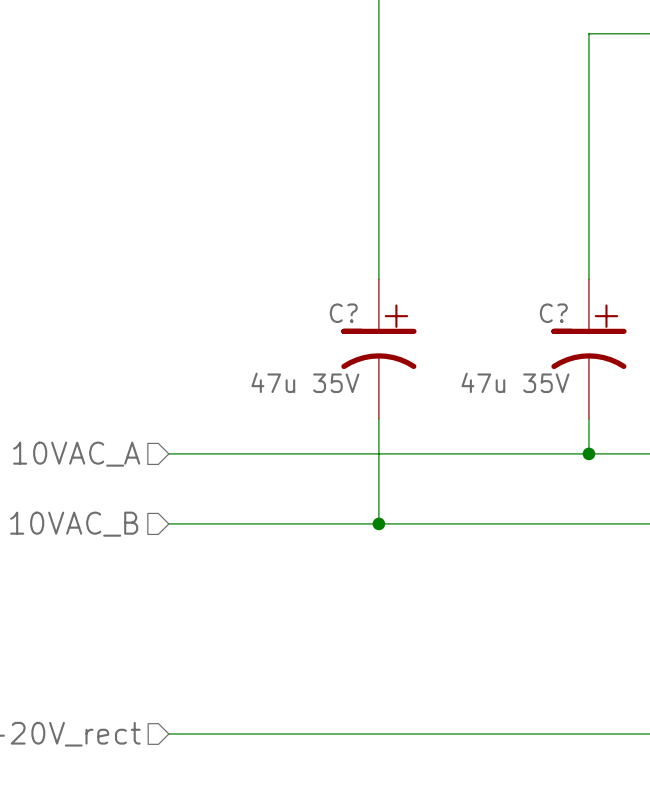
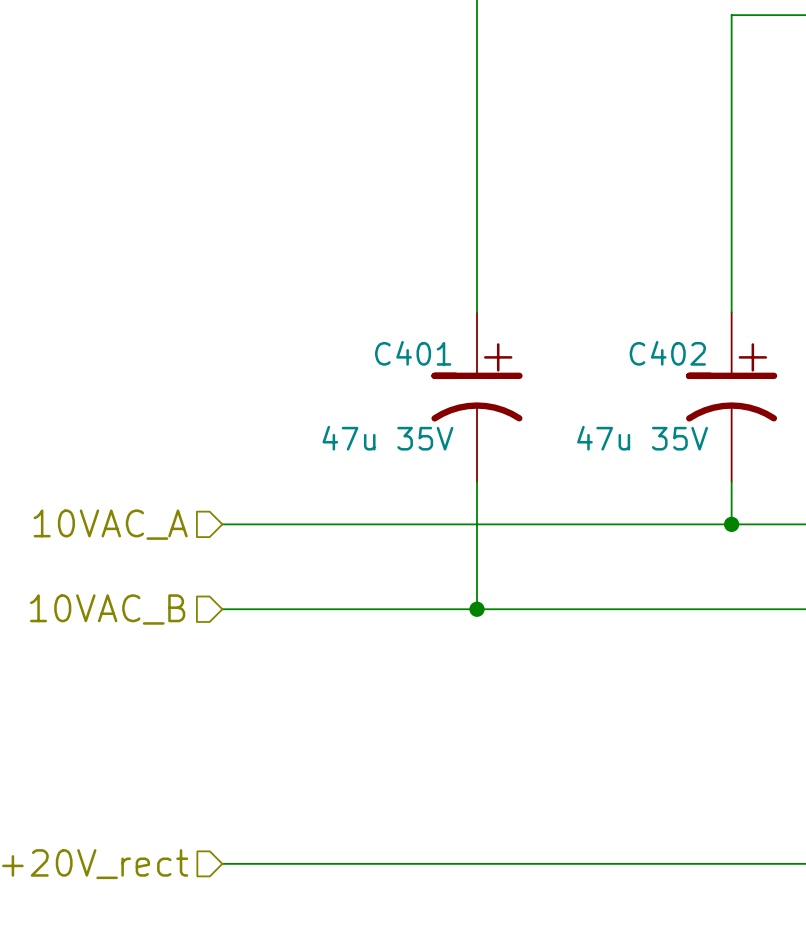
C? name: C? (343, 313) -> C401 (413, 353)
C? name: C? (553, 313) -> C402 (667, 353)

